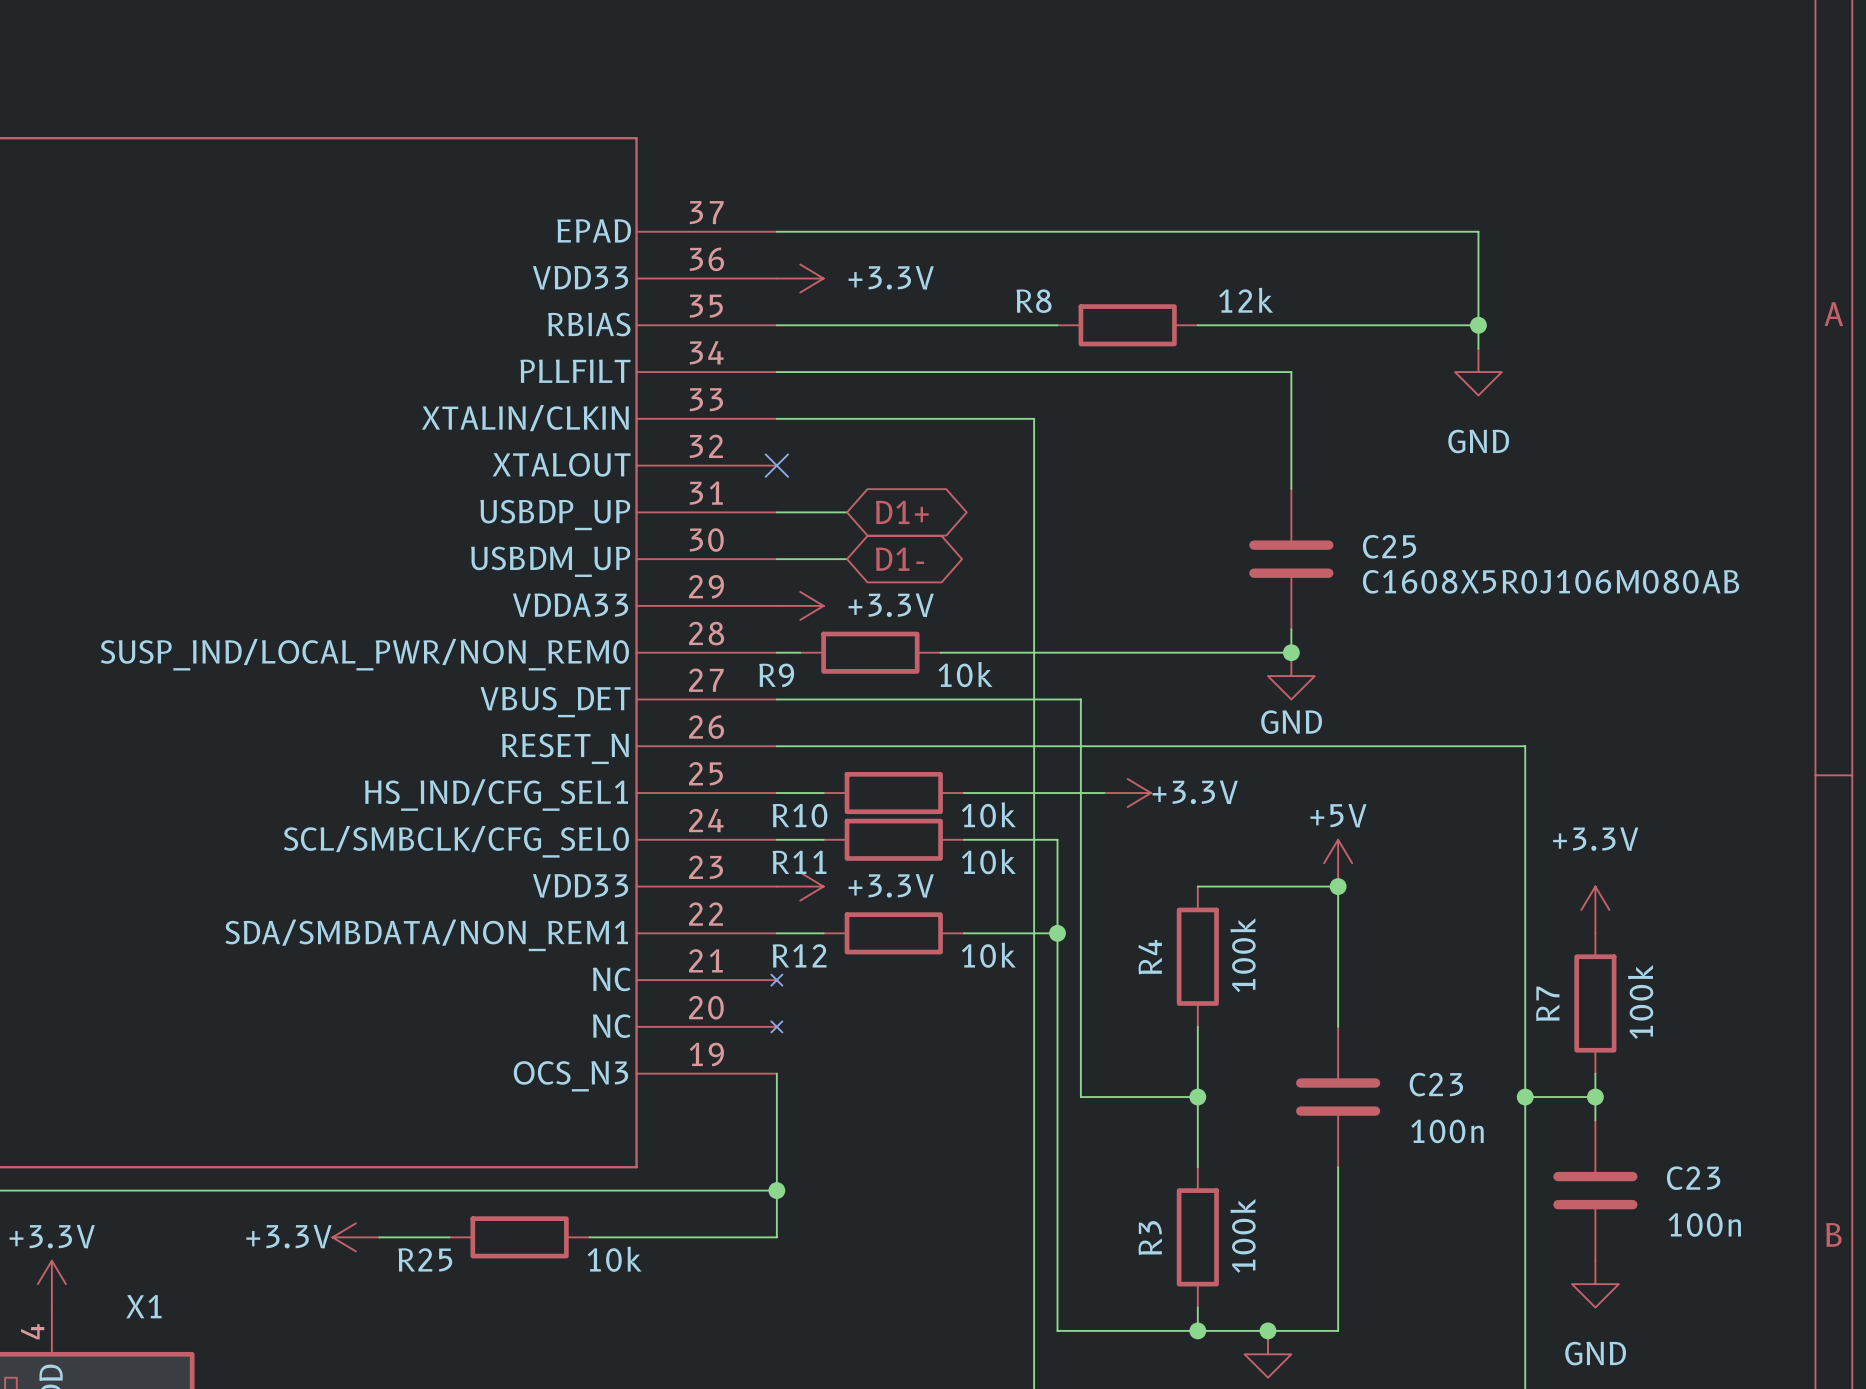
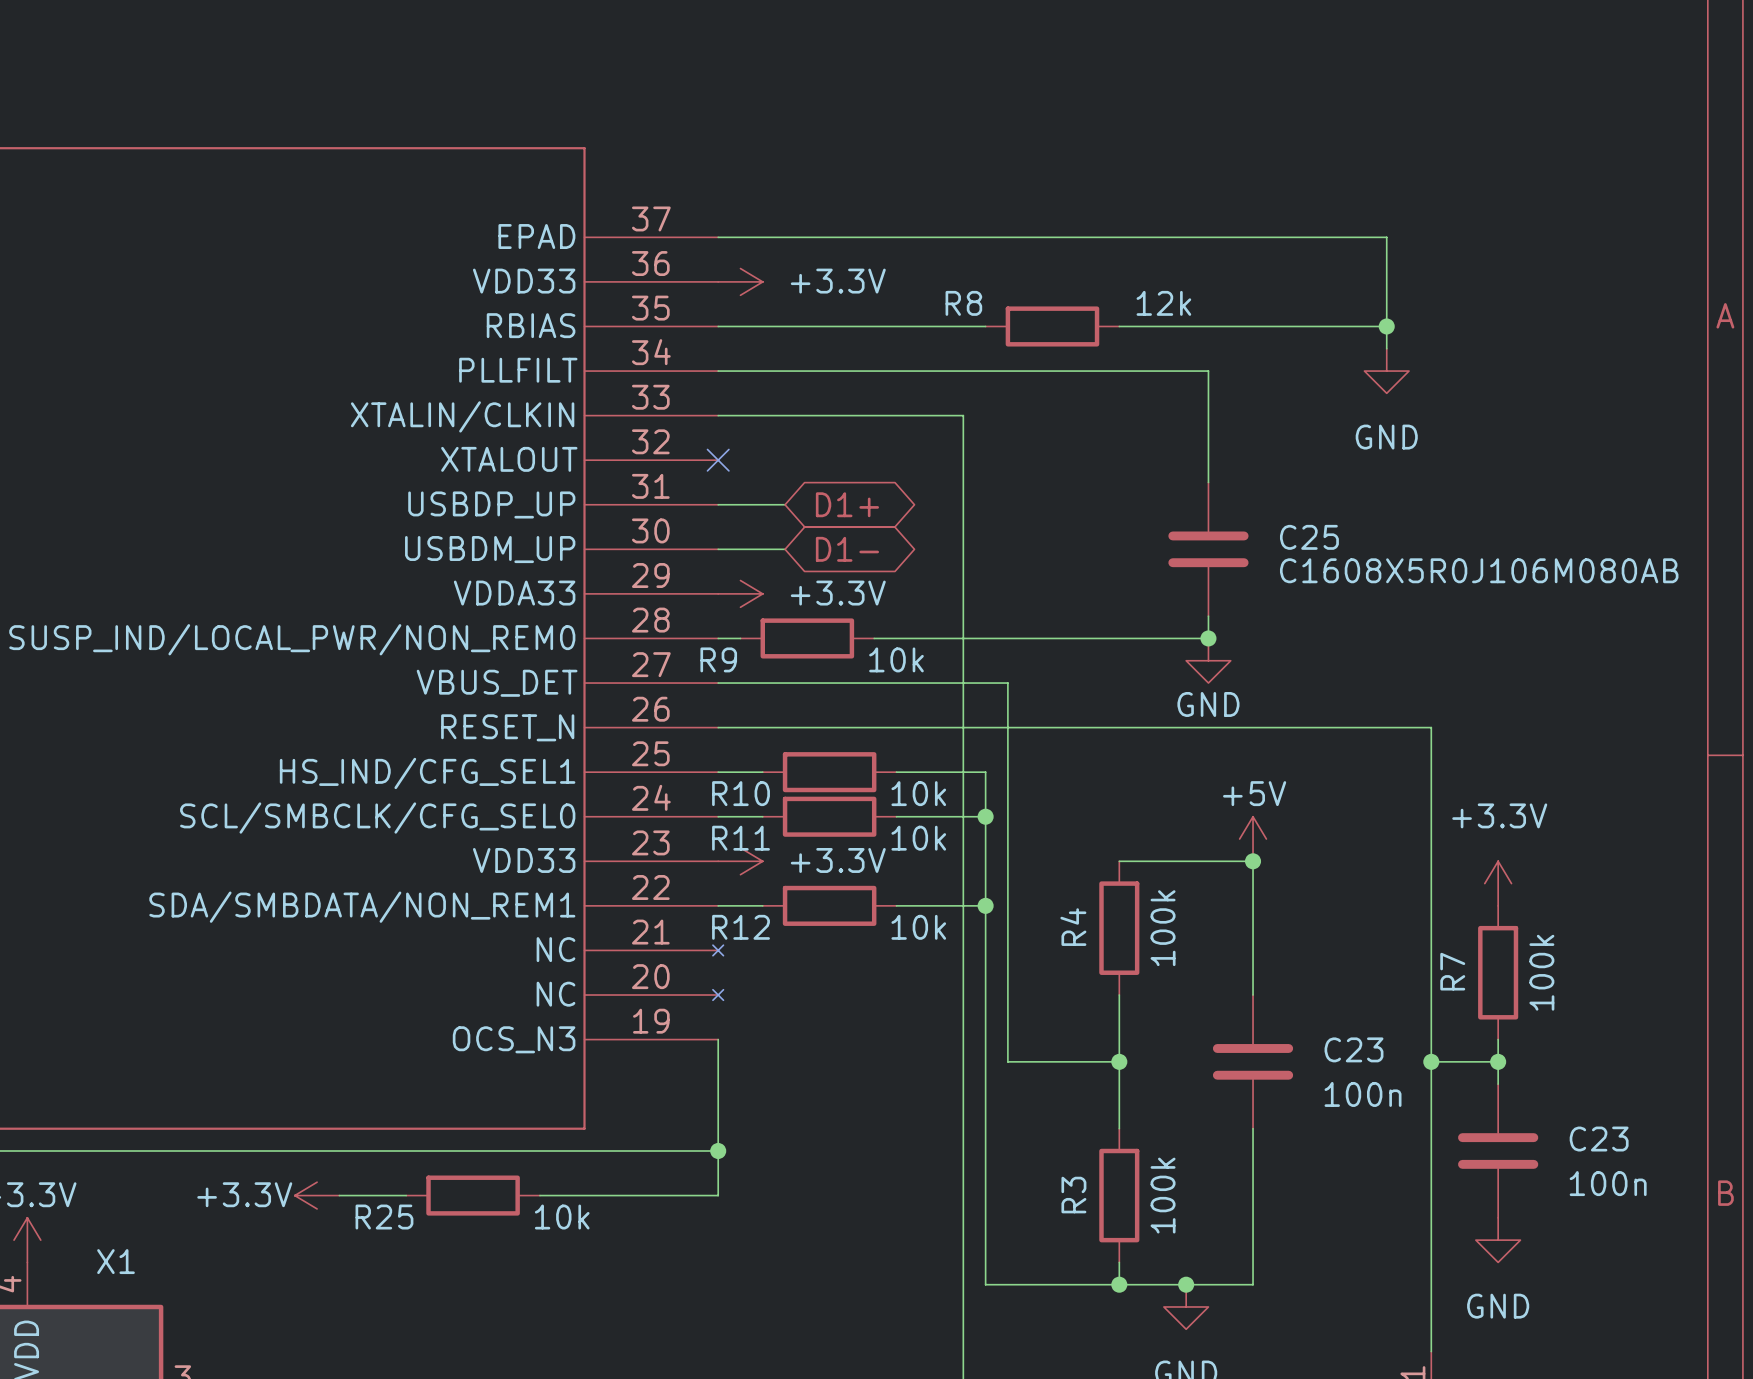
wire: (1057, 793) (1104, 793) -> (985, 772) (985, 816)
power symbol: +3.3V (1127, 793) -> none
junction: none -> (985, 816)

